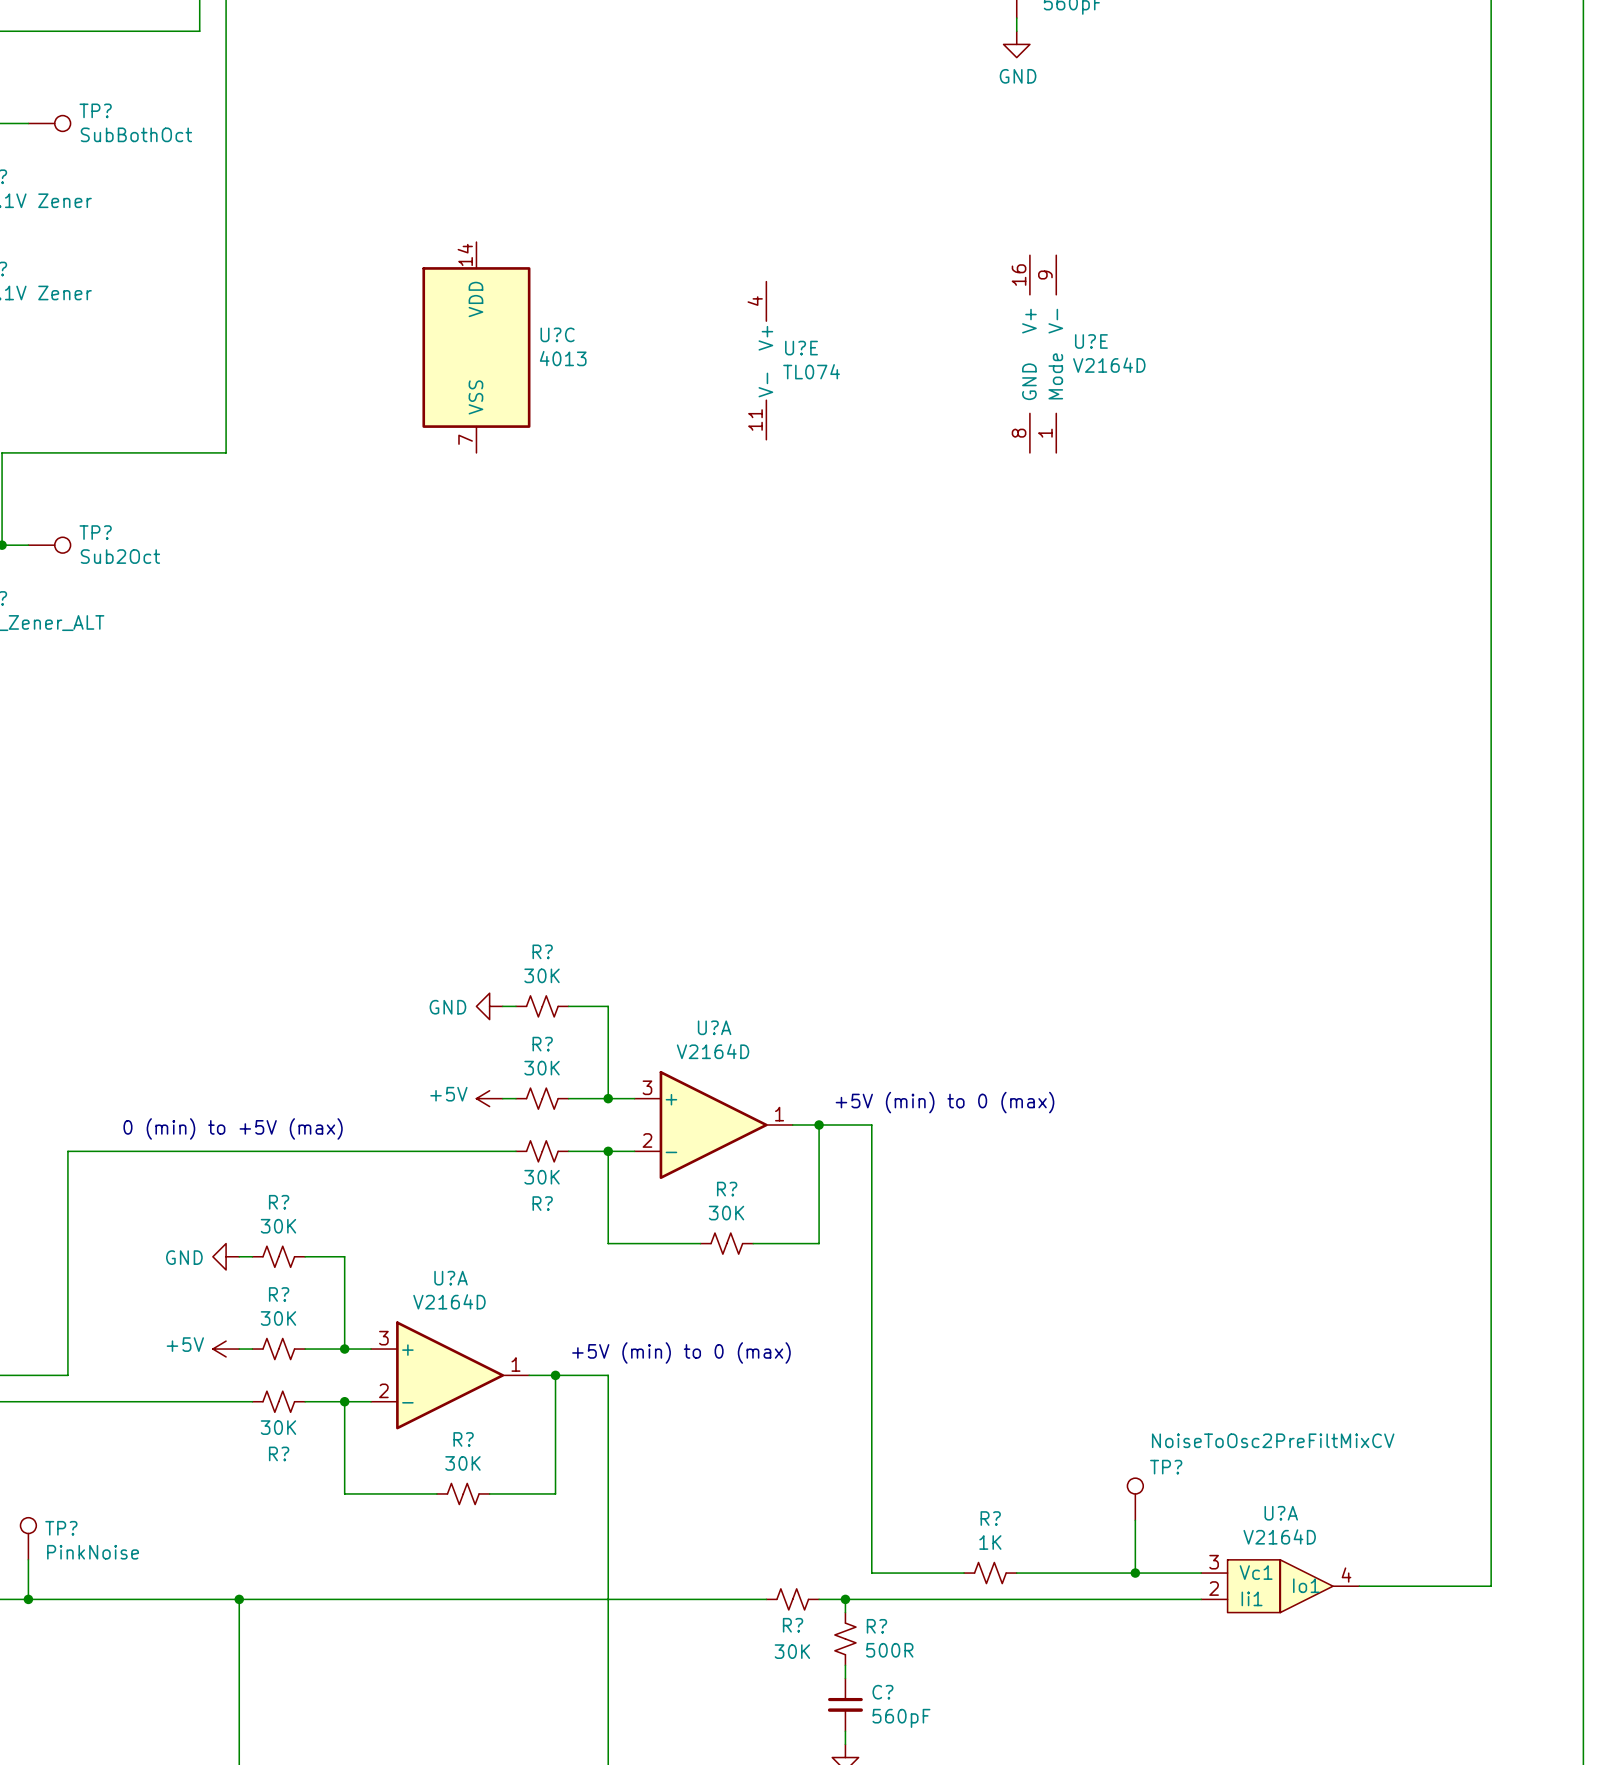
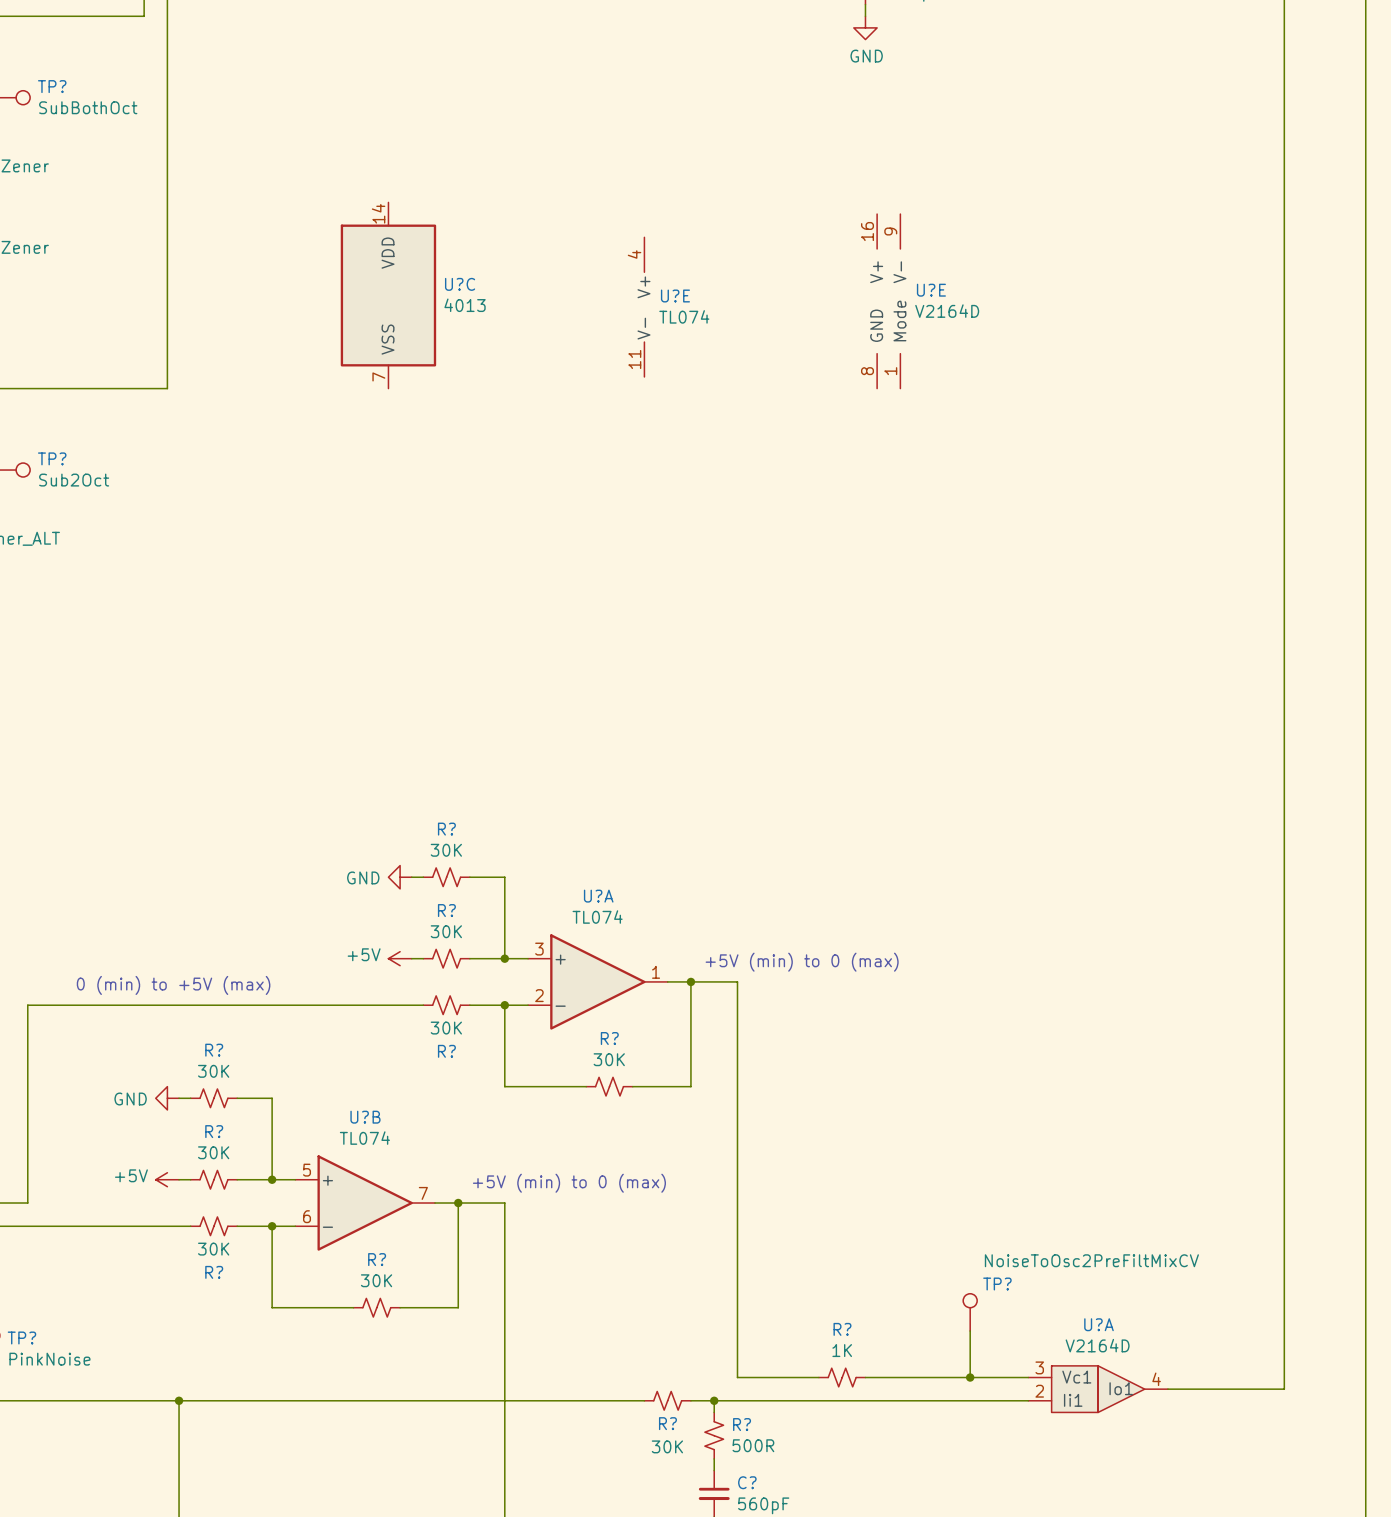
U?A value: V2164D (713, 1051) -> TL074 (597, 917)
U?A name: U?A (451, 1278) -> U?B (365, 1117)
U?A value: V2164D (449, 1301) -> TL074 (364, 1138)
U?A pin number: 3 (383, 1338) -> 5 (307, 1170)
U?A pin number: 1 (515, 1364) -> 7 (423, 1193)
U?A pin number: 2 (383, 1390) -> 6 (307, 1216)

